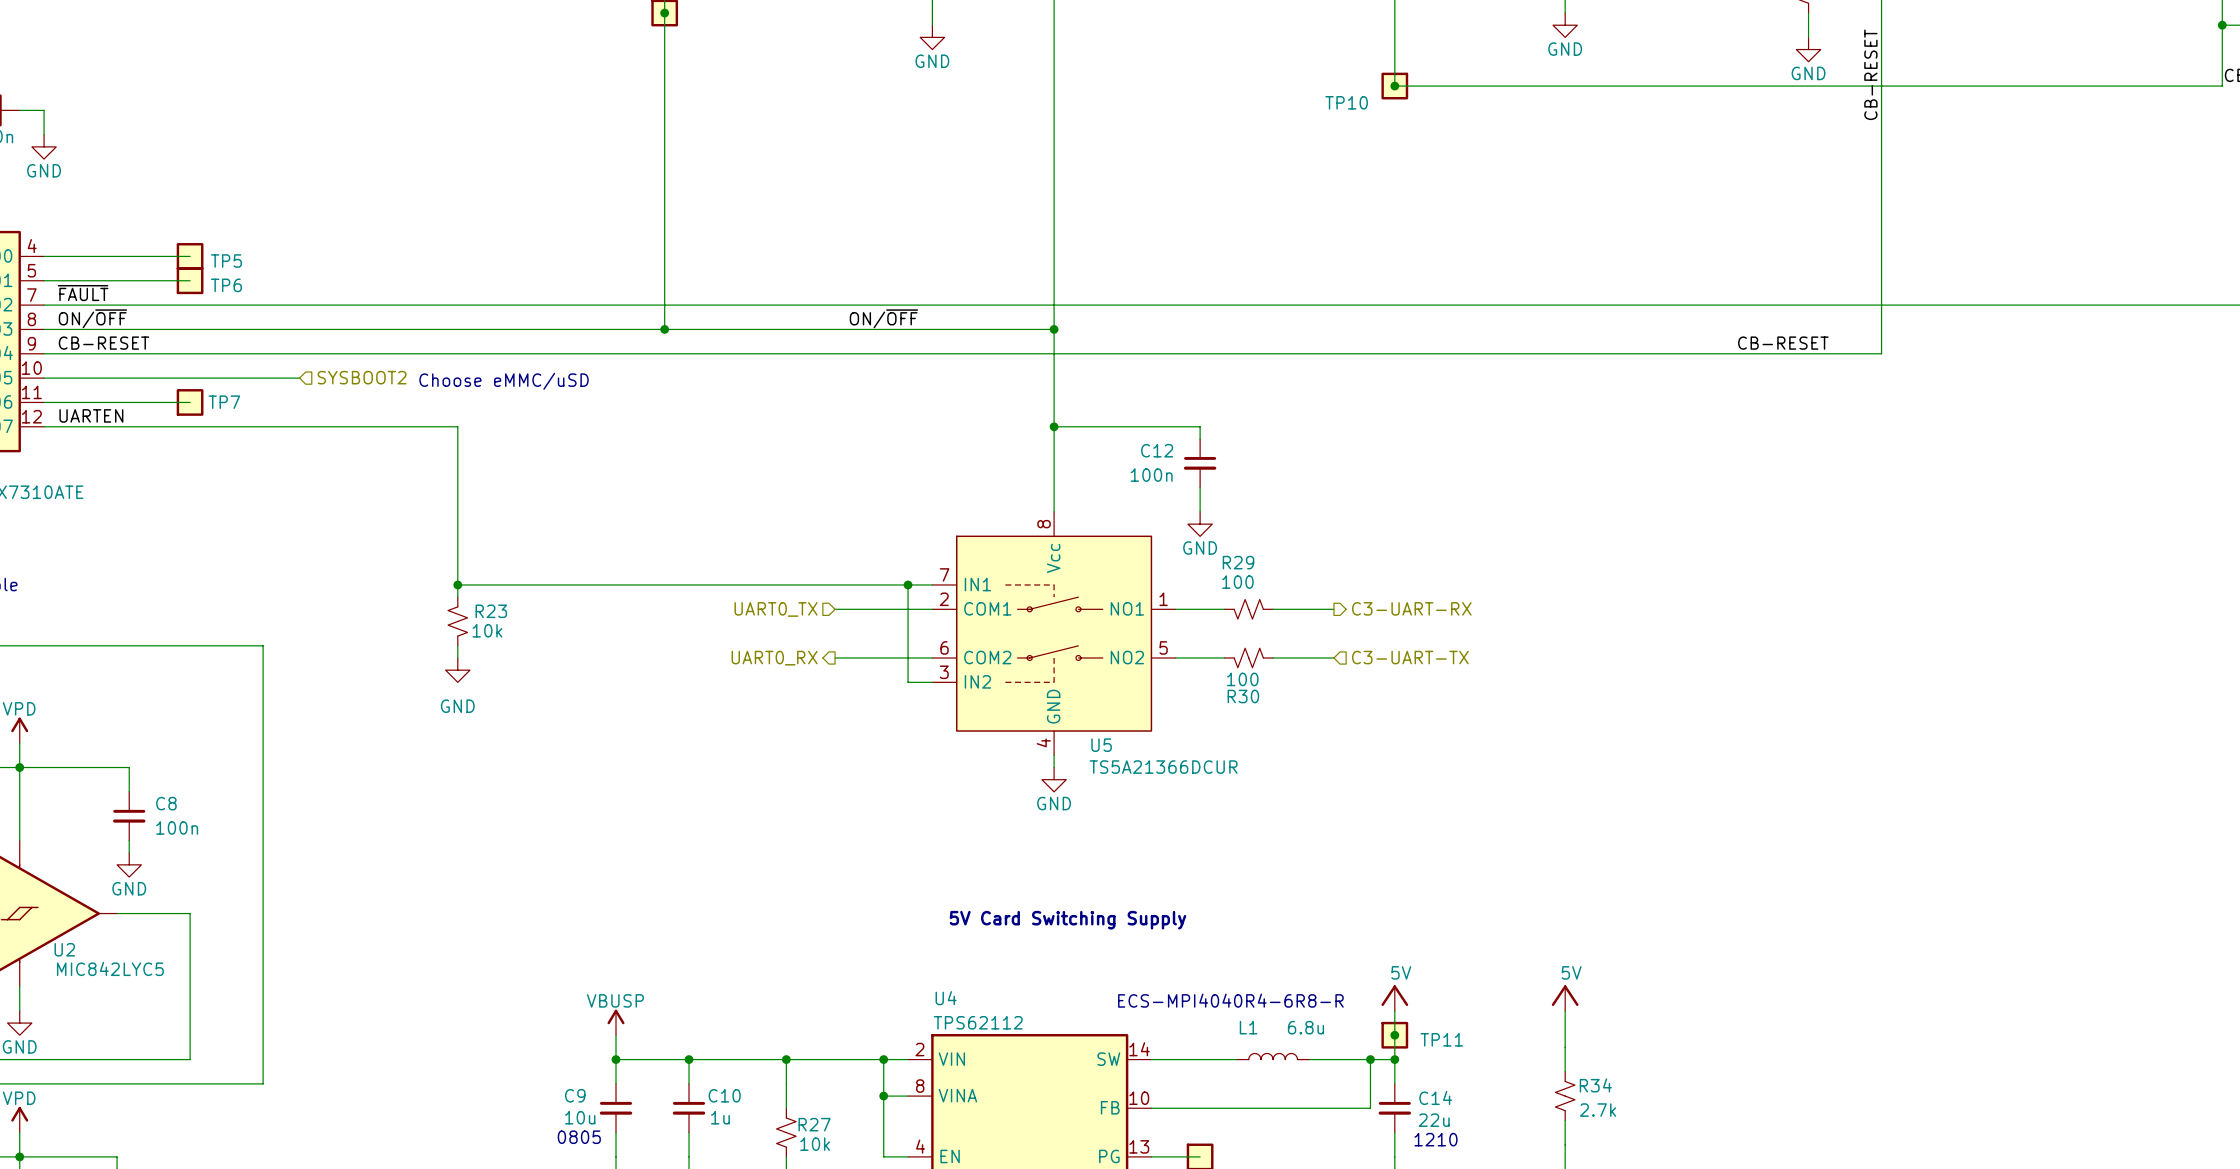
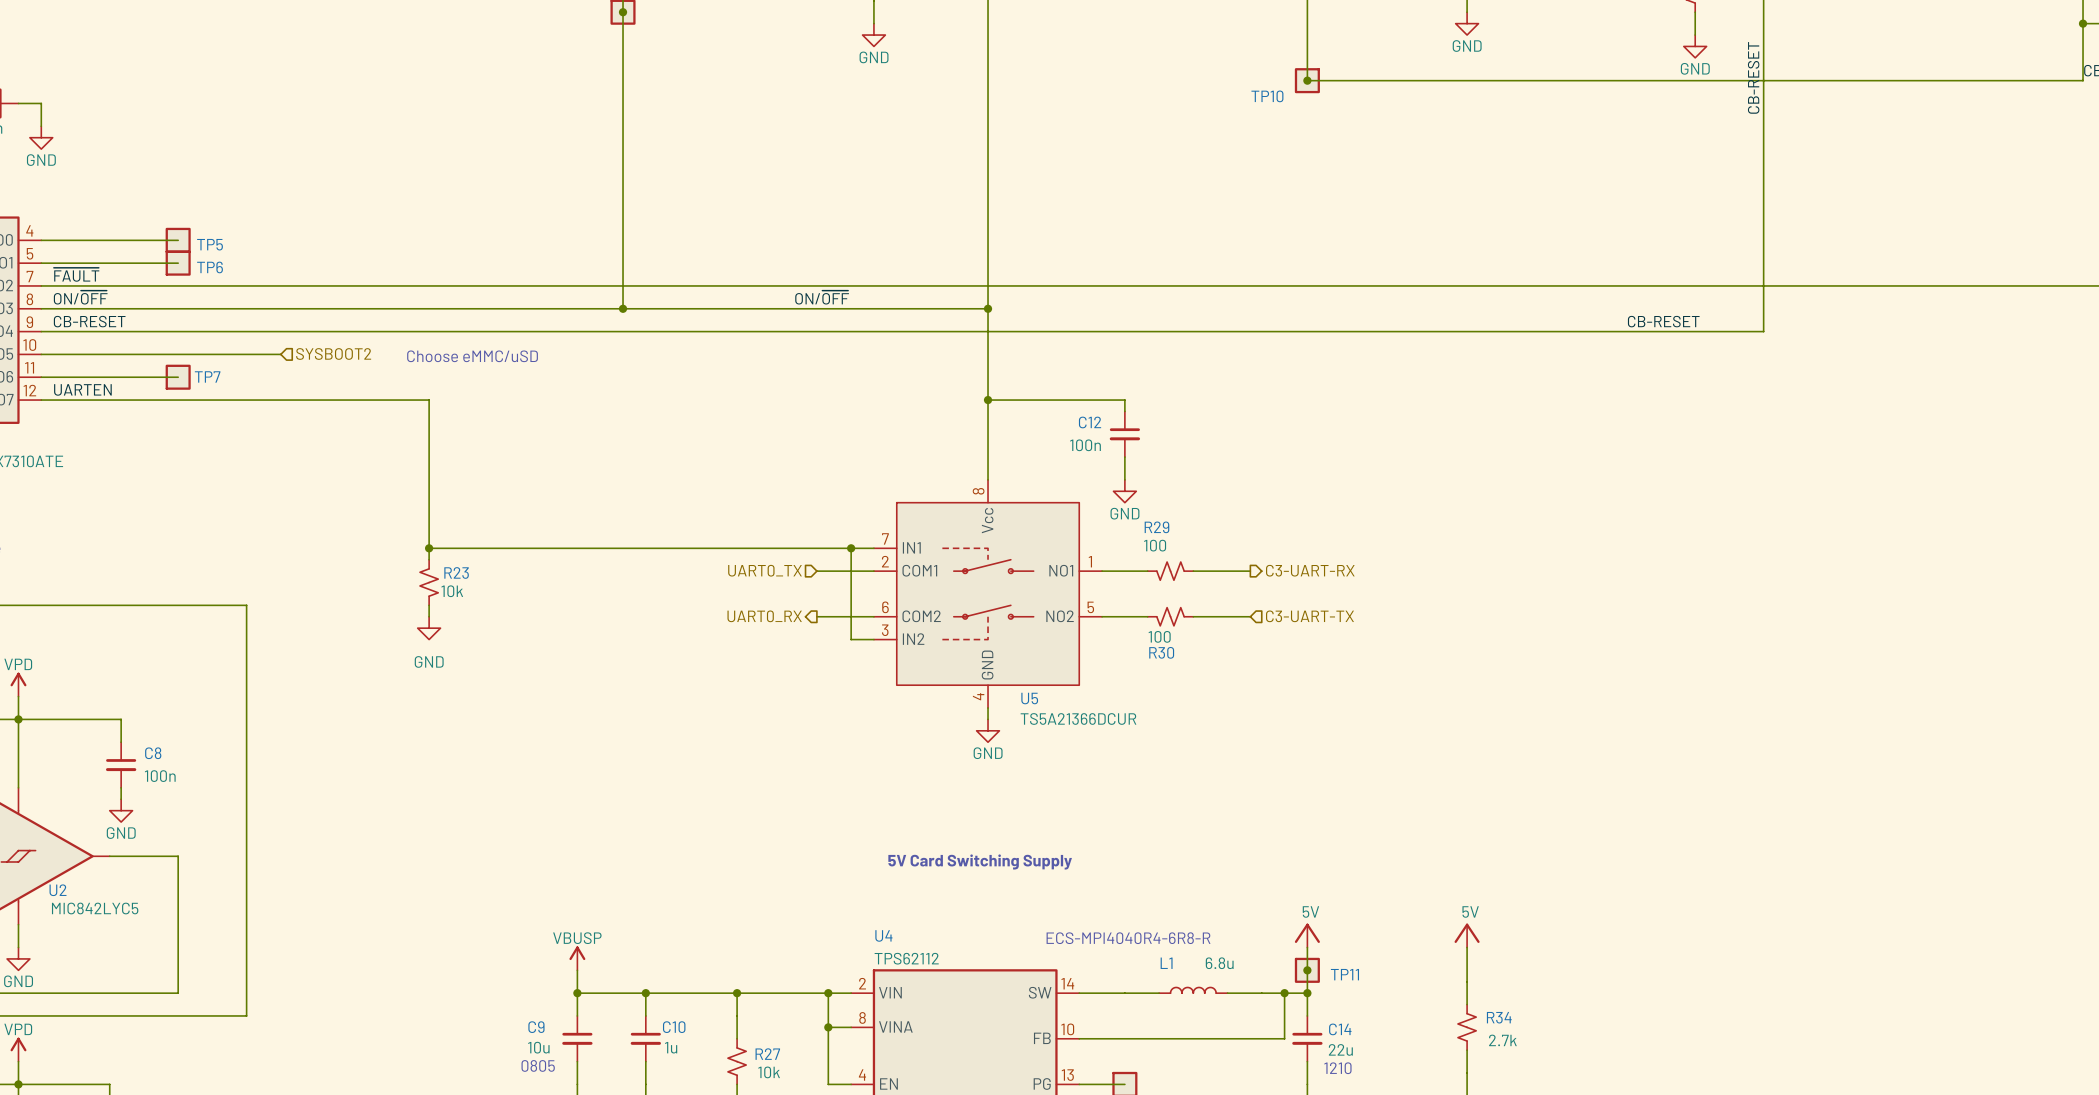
hierarchical label position: UART0_TX (776, 609) -> UART0_TX (765, 570)
wire: (835, 609) (871, 609) -> none
wire: (835, 657) (871, 657) -> none
hierarchical label position: UART0_RX (774, 658) -> UART0_RX (764, 616)

